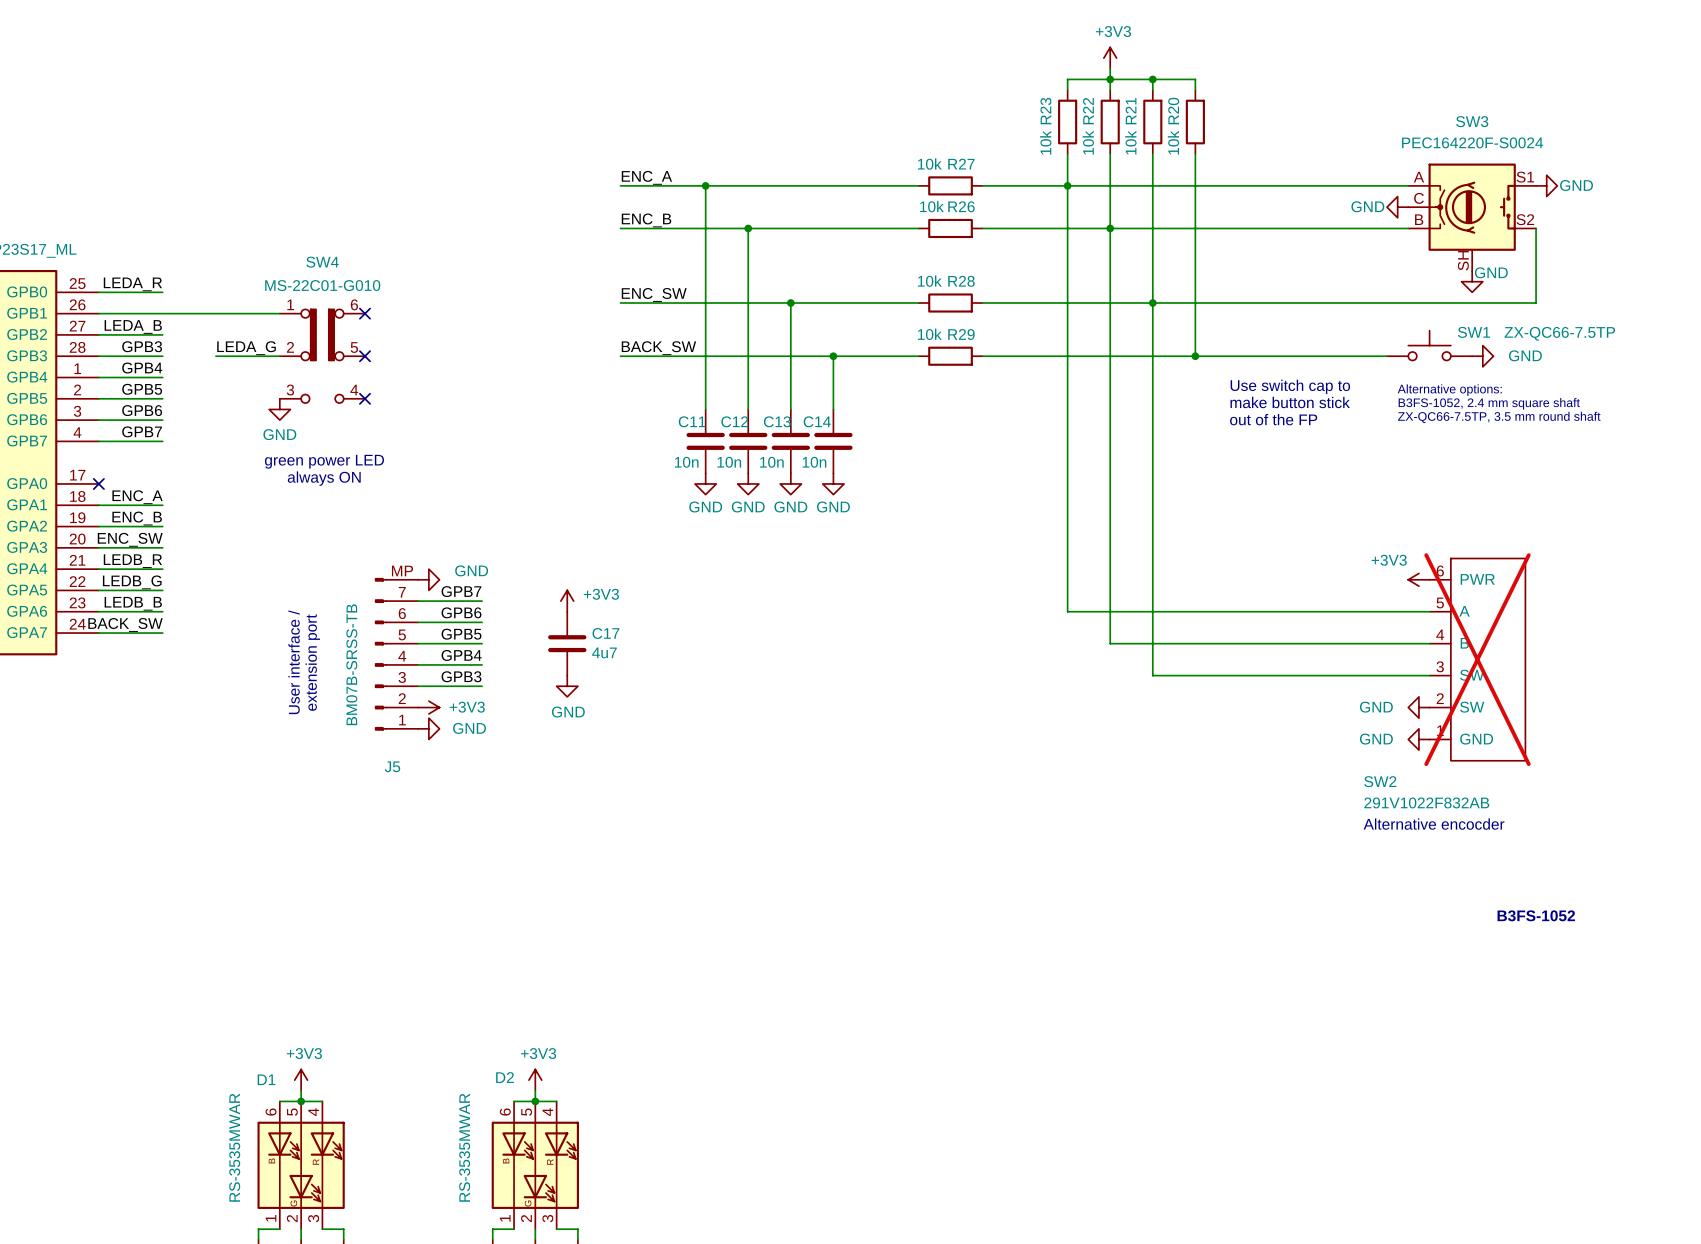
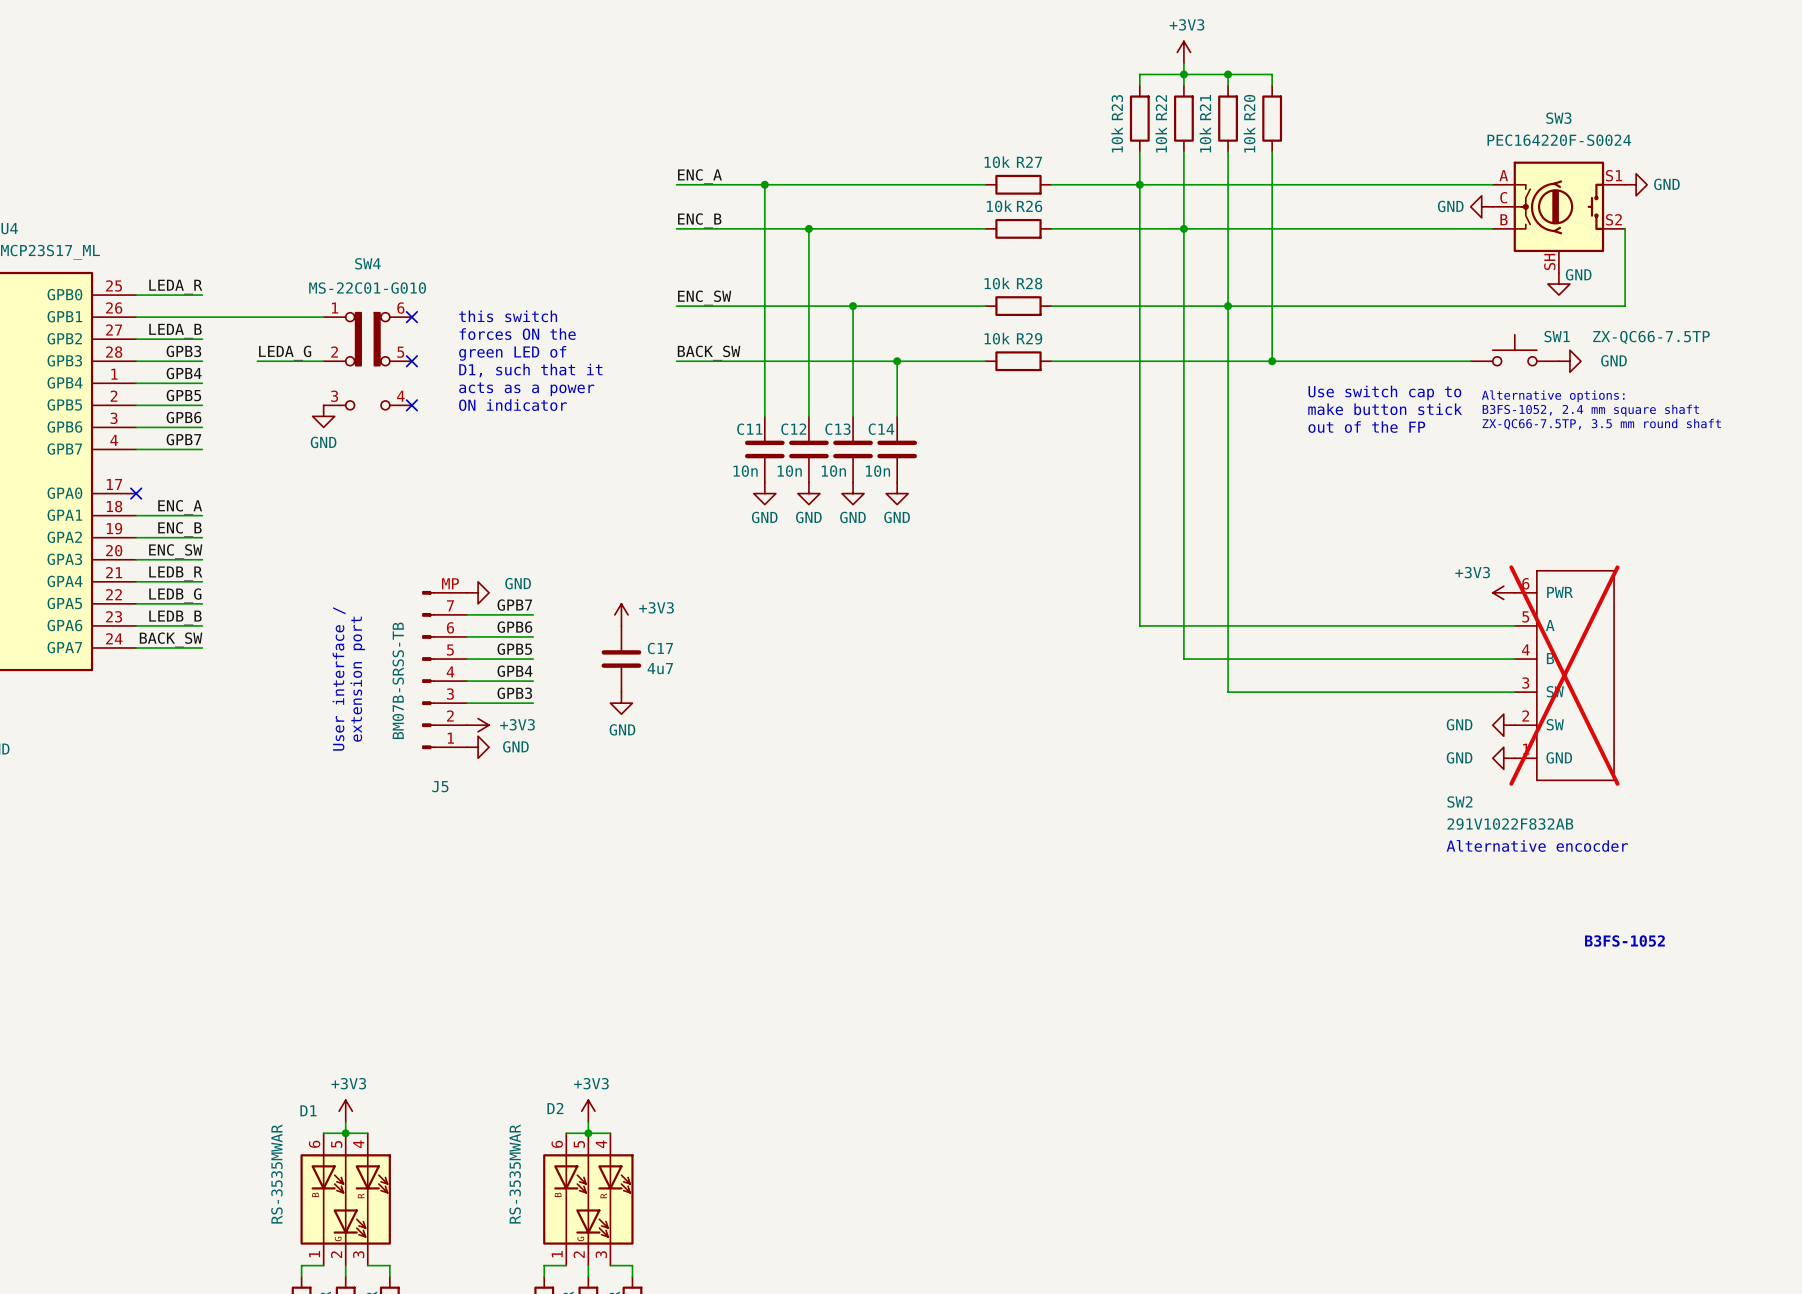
text: none -> this switch (508, 316)
text: none -> forces ON the (517, 334)
text: none -> green LED of (512, 353)
text: none -> D1, such that it (530, 370)
text: none -> acts as a power (526, 389)
text: none -> ON indicator (513, 405)
text: green power LED (324, 461) -> none
text: always ON (324, 478) -> none

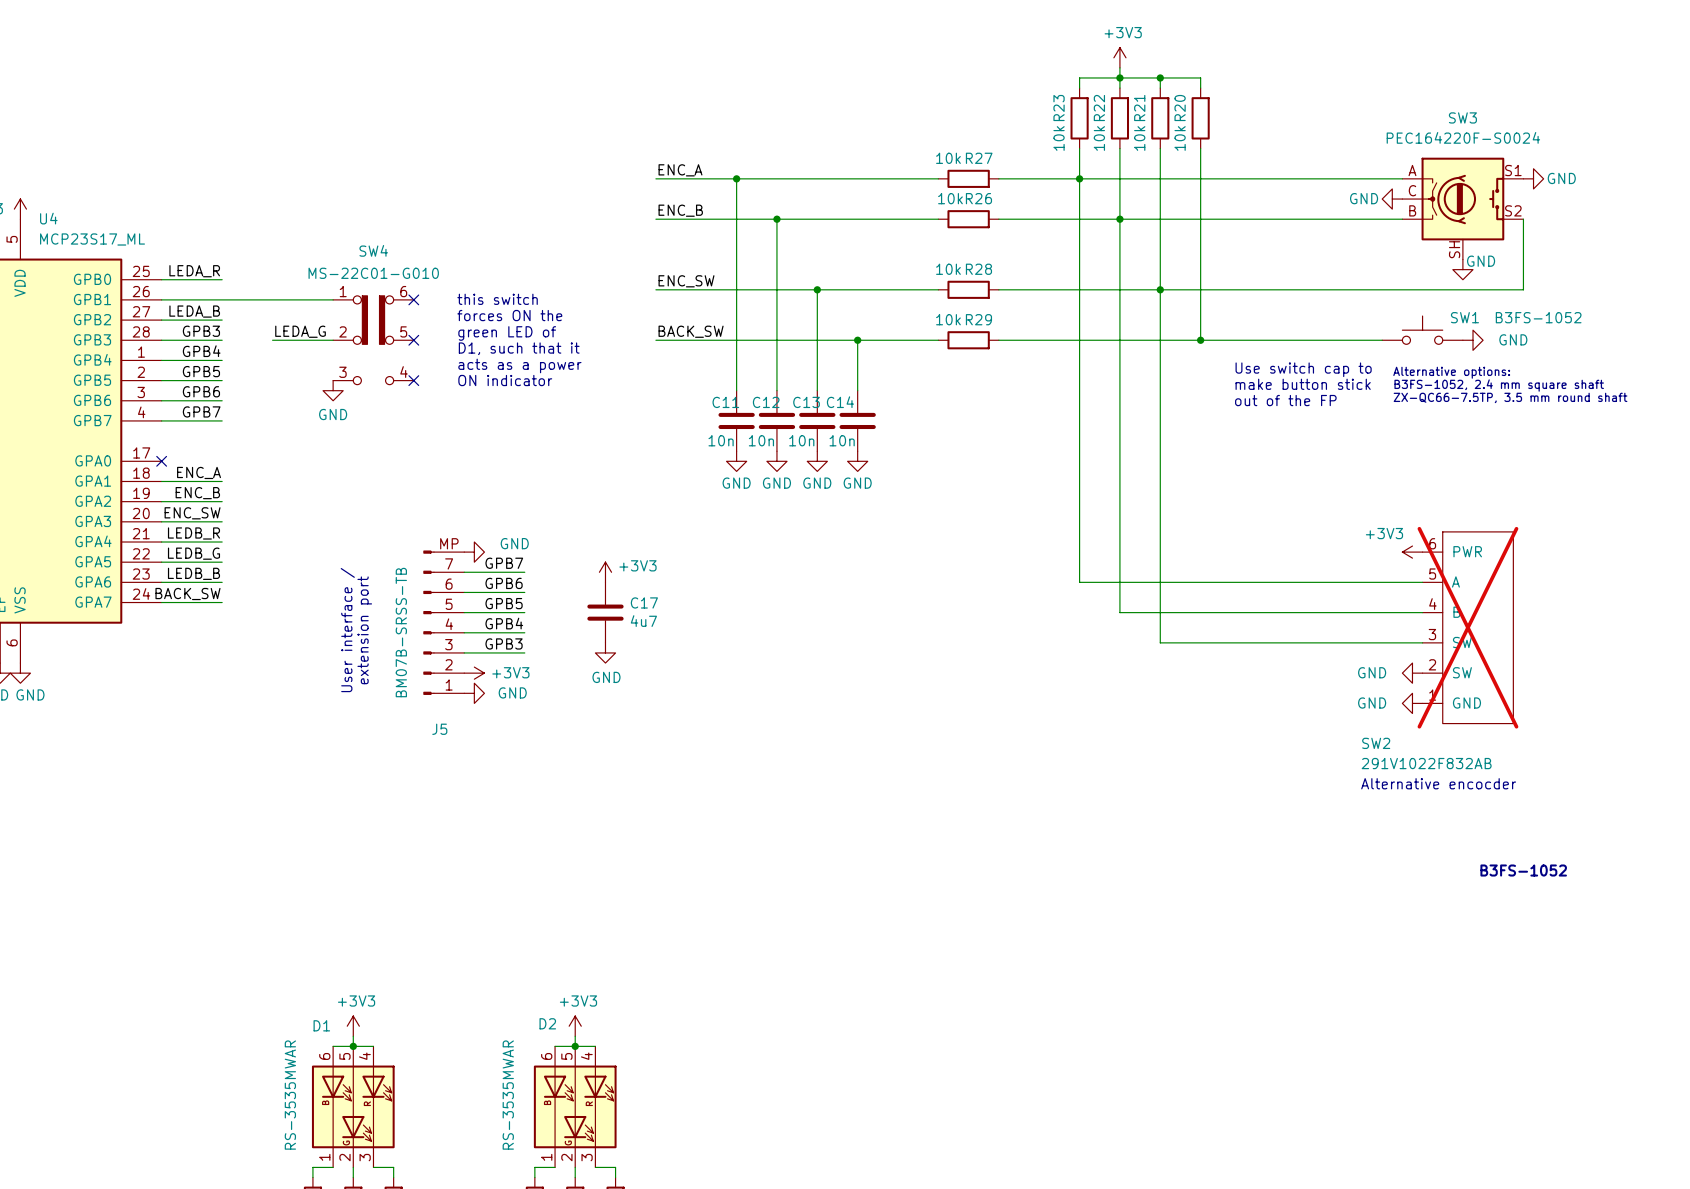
SW1 value: ZX-QC66-7.5TP (1651, 337) -> B3FS-1052 (1538, 317)

